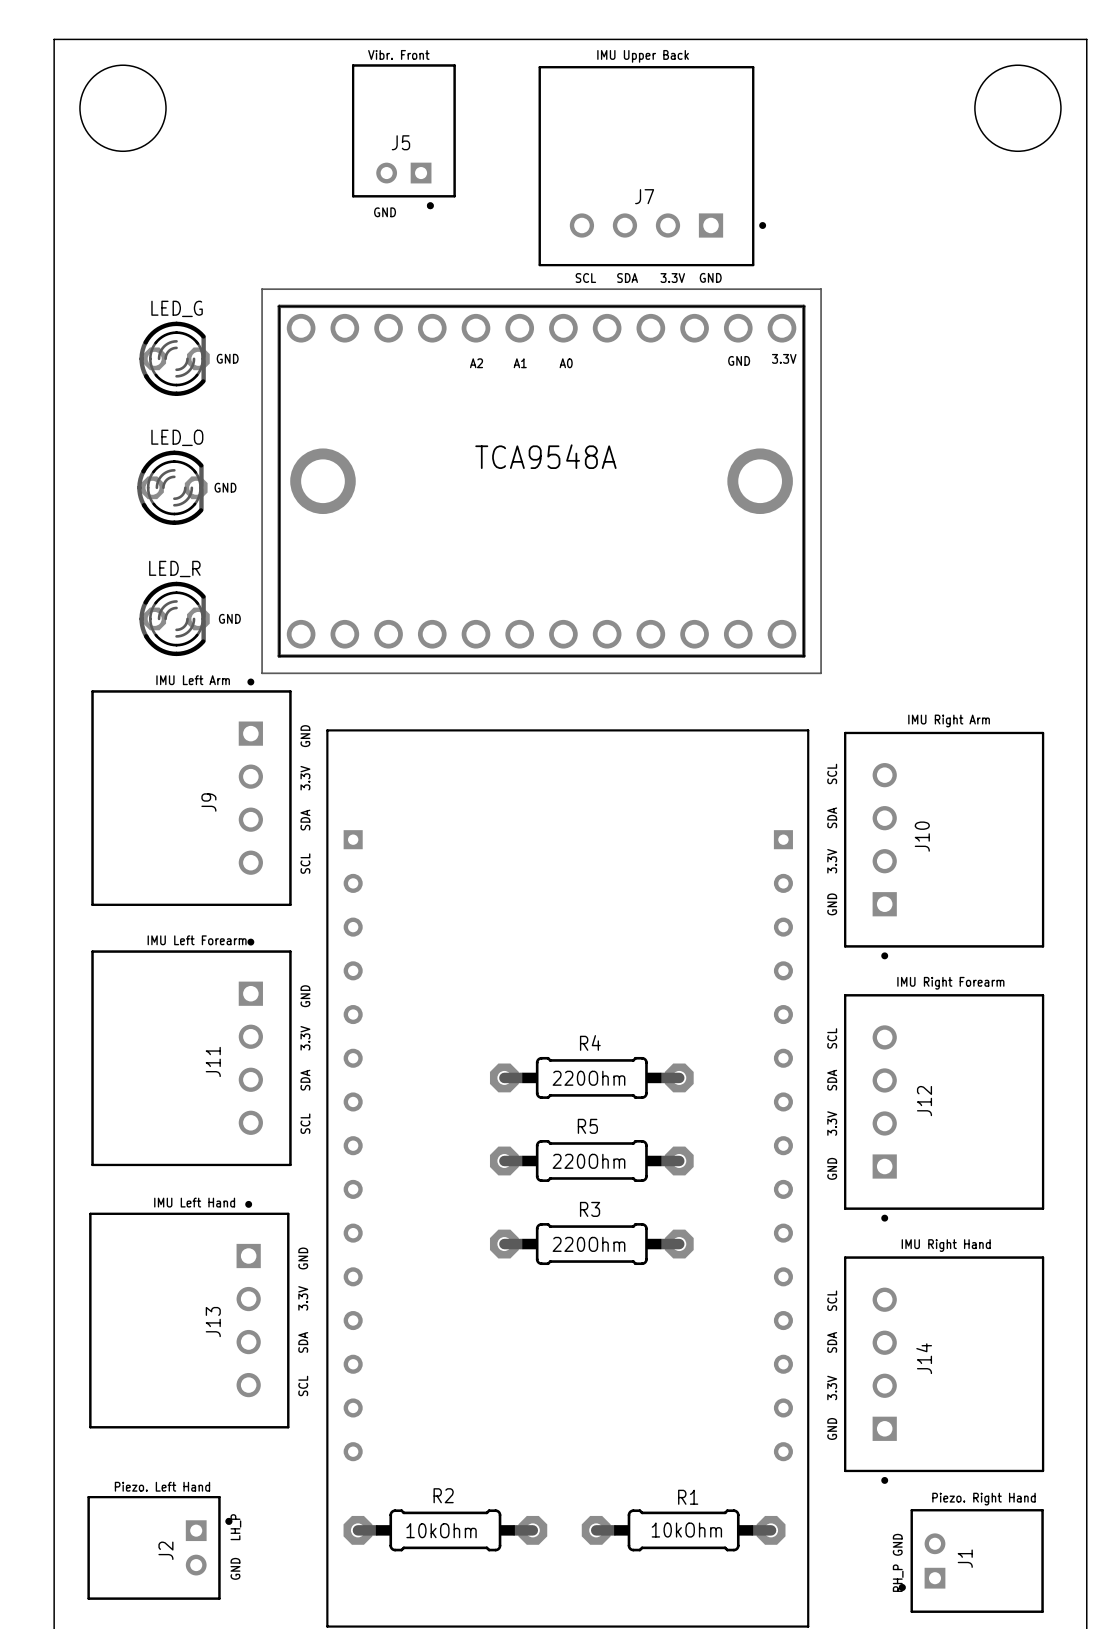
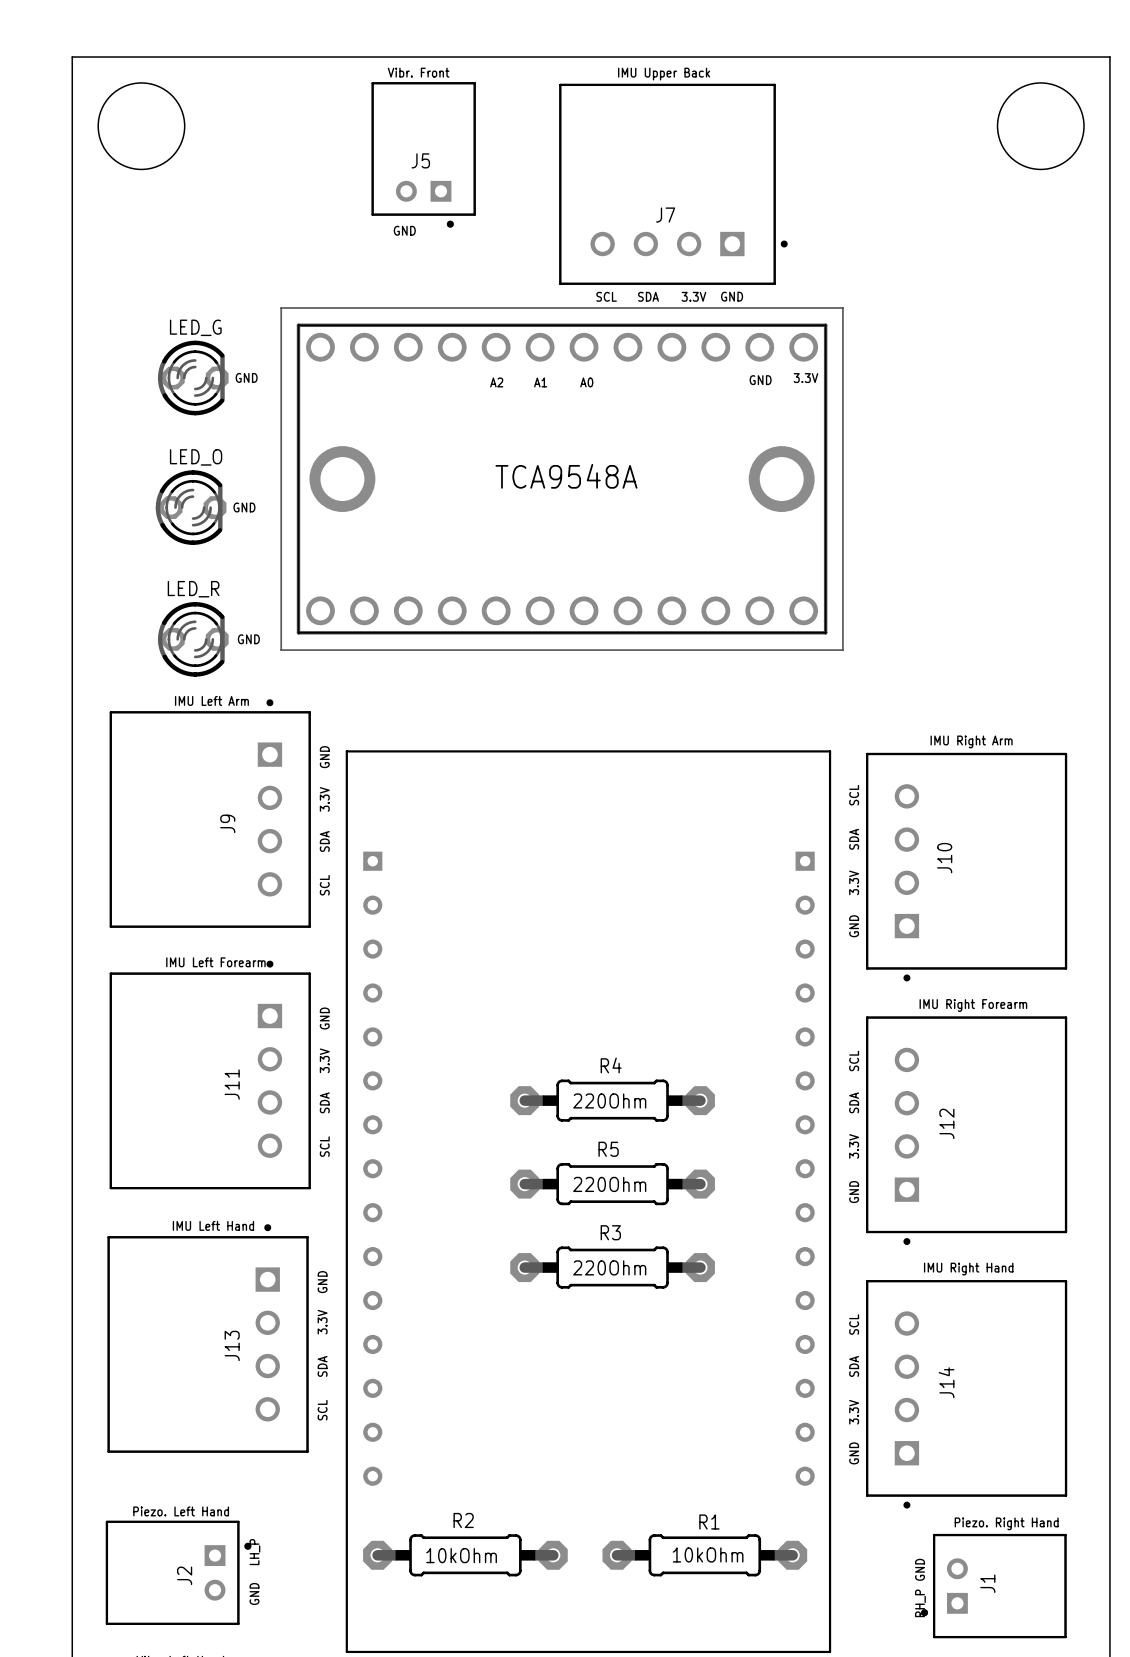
TCA9548A footprint: [261, 288, 822, 675] -> [280, 307, 844, 651]

